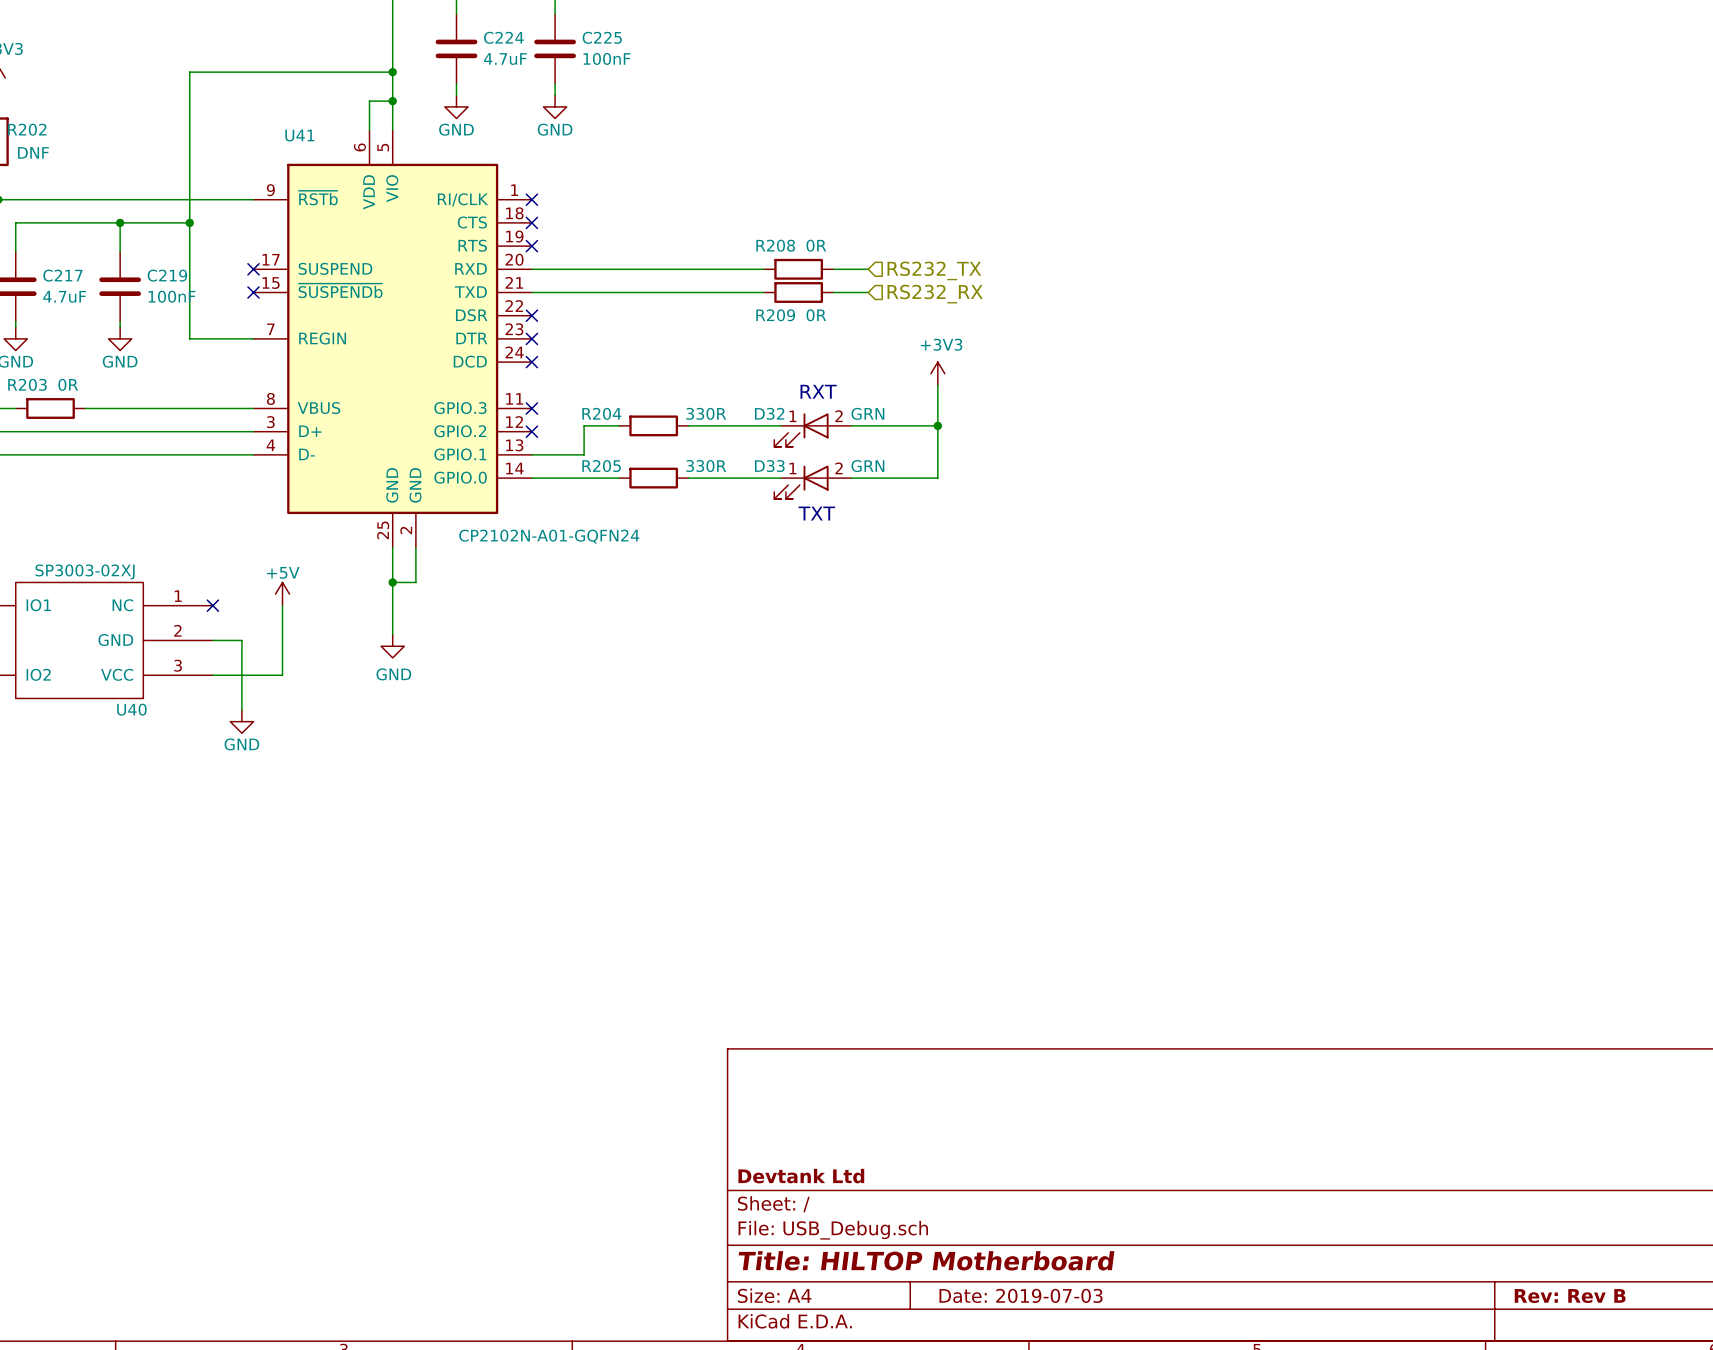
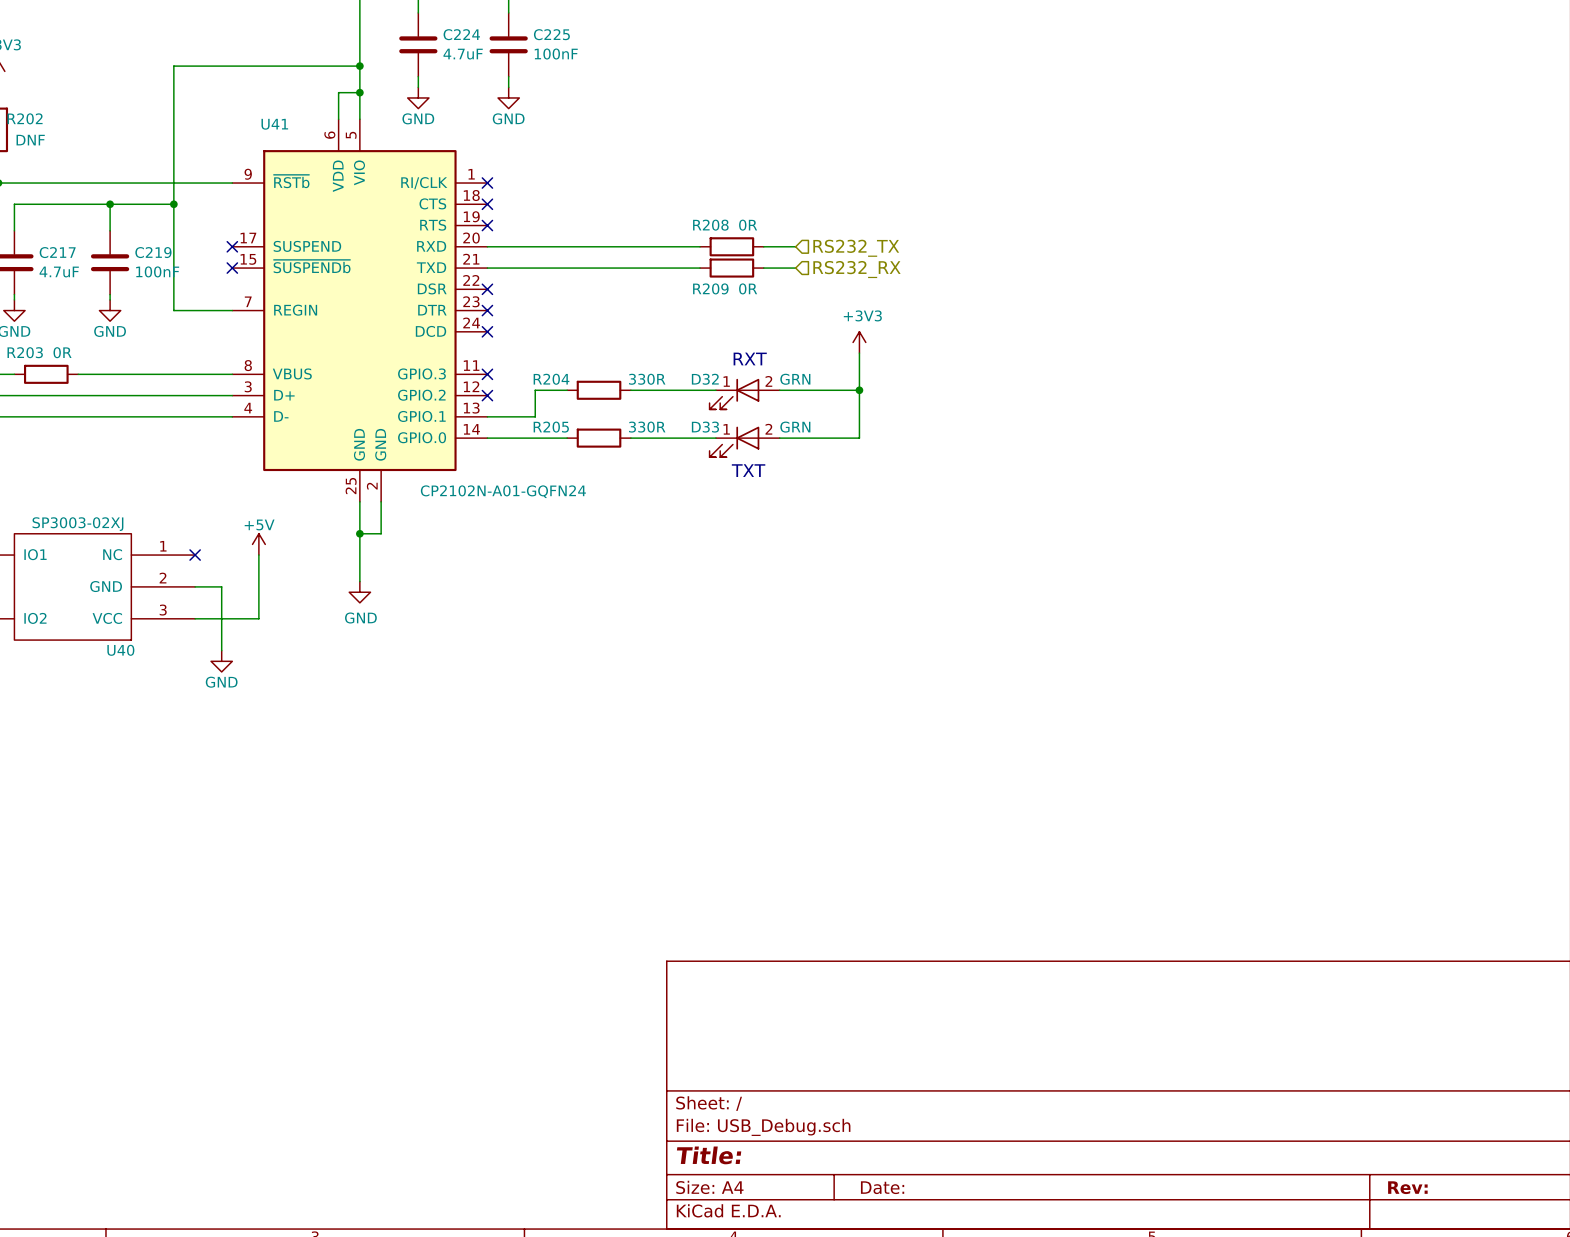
title block: Devtank Ltd (801, 1176) -> none
title block: Title: HILTOP Motherboard (926, 1260) -> Title: (709, 1155)
title block: Date: 2019-07-03 (1021, 1295) -> Date: (882, 1187)
title block: Rev: Rev B (1570, 1296) -> Rev: (1407, 1187)

